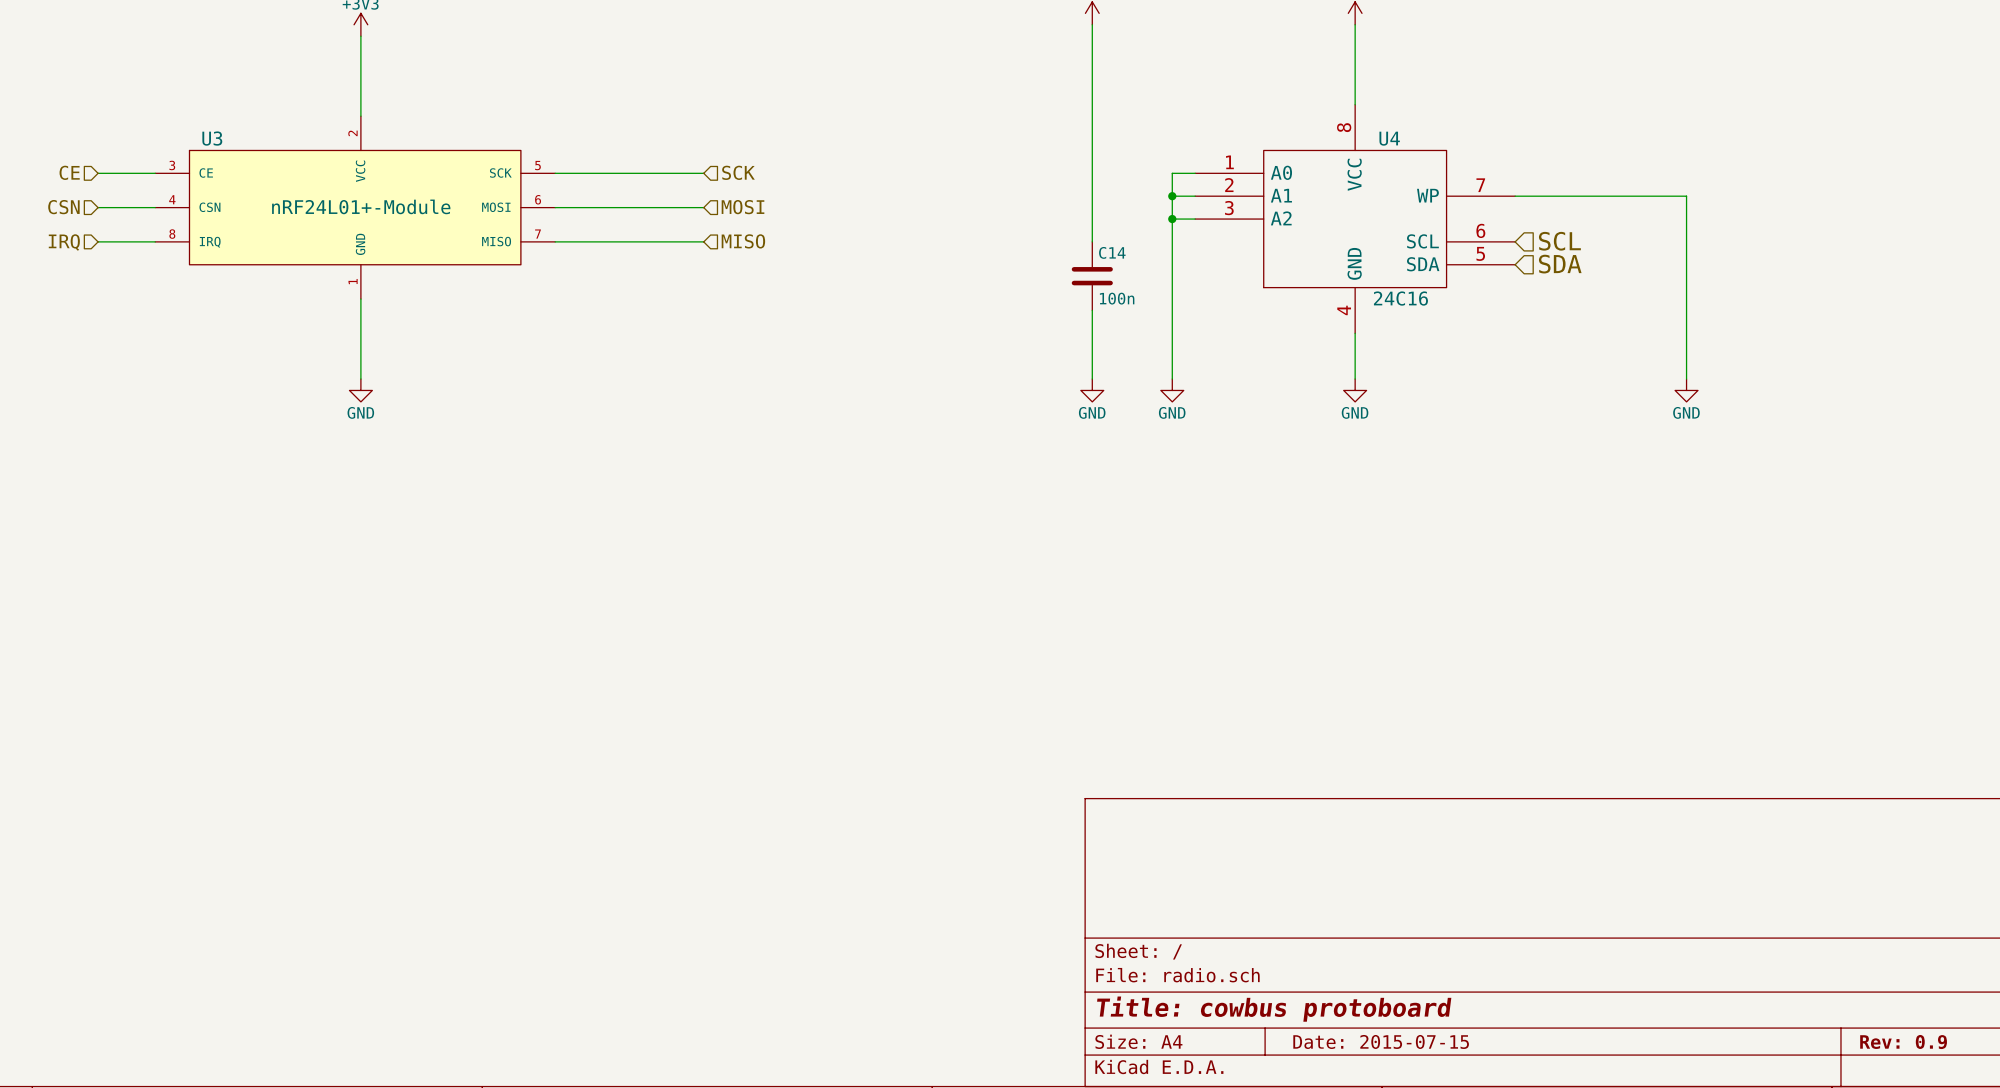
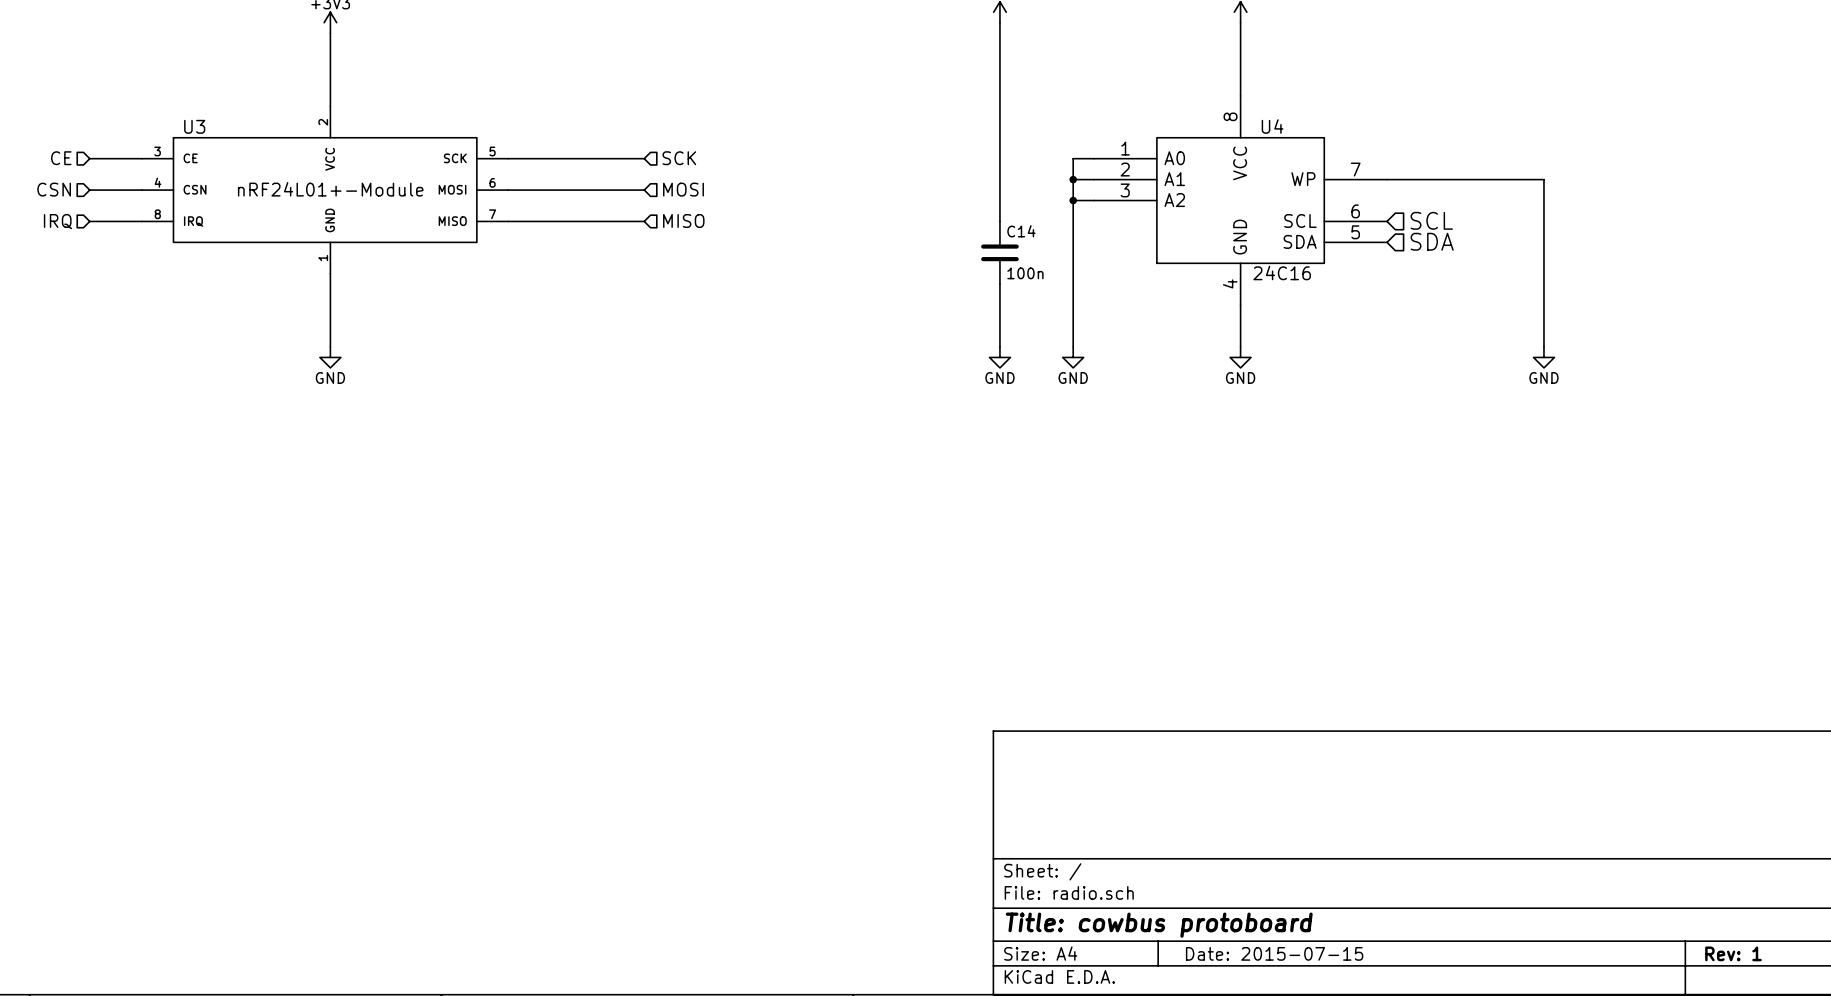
title block: Rev: 0.9 (1903, 1042) -> Rev: 1 (1733, 953)

